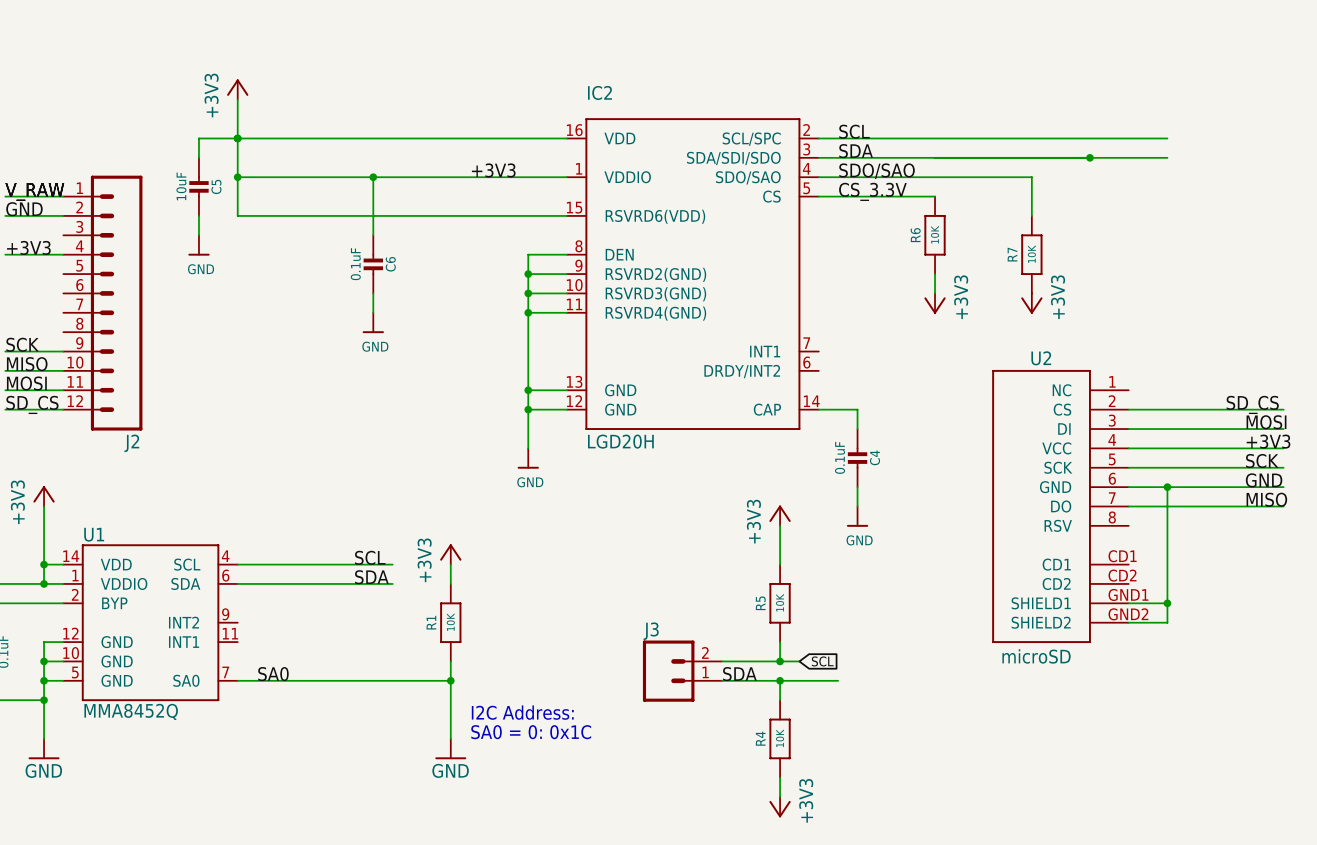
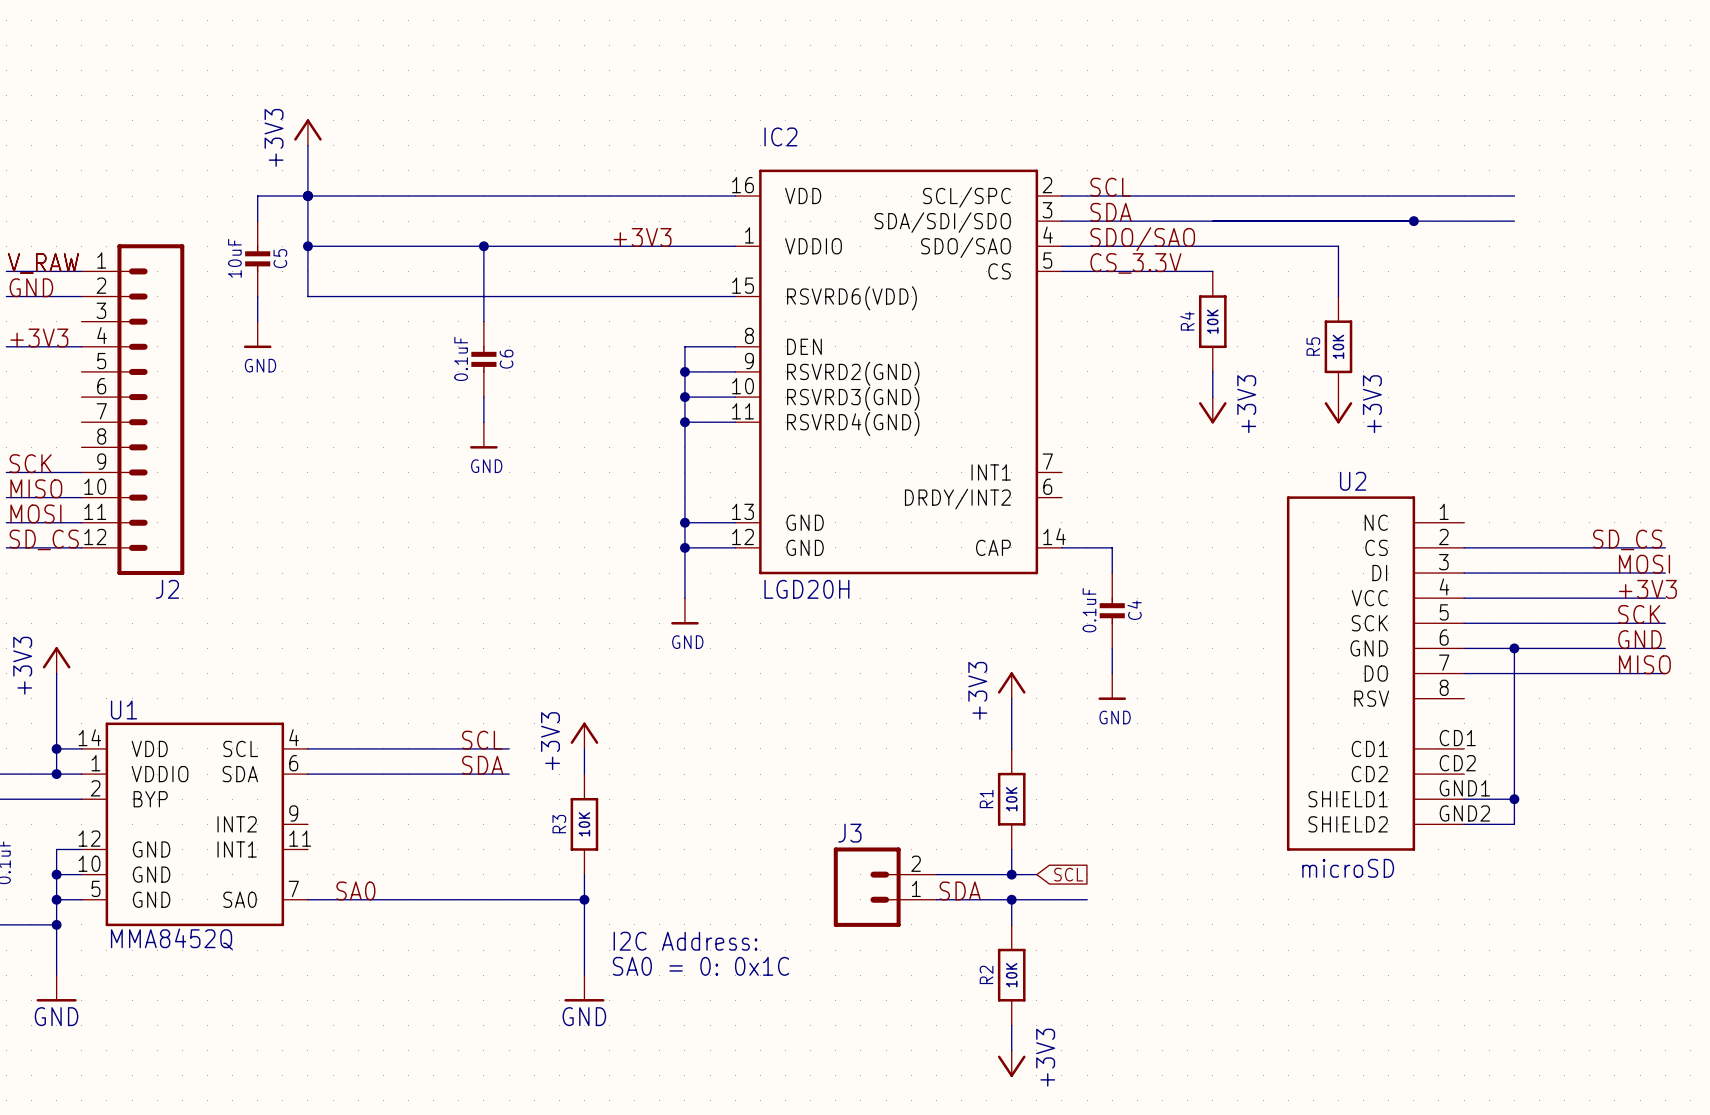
R6 name: R6 (915, 235) -> R4 (1187, 321)
R7 name: R7 (1012, 254) -> R5 (1313, 346)
R5 name: R5 (760, 603) -> R1 (986, 798)
R1 name: R1 (431, 622) -> R3 (559, 824)
R4 name: R4 (760, 738) -> R2 (986, 974)

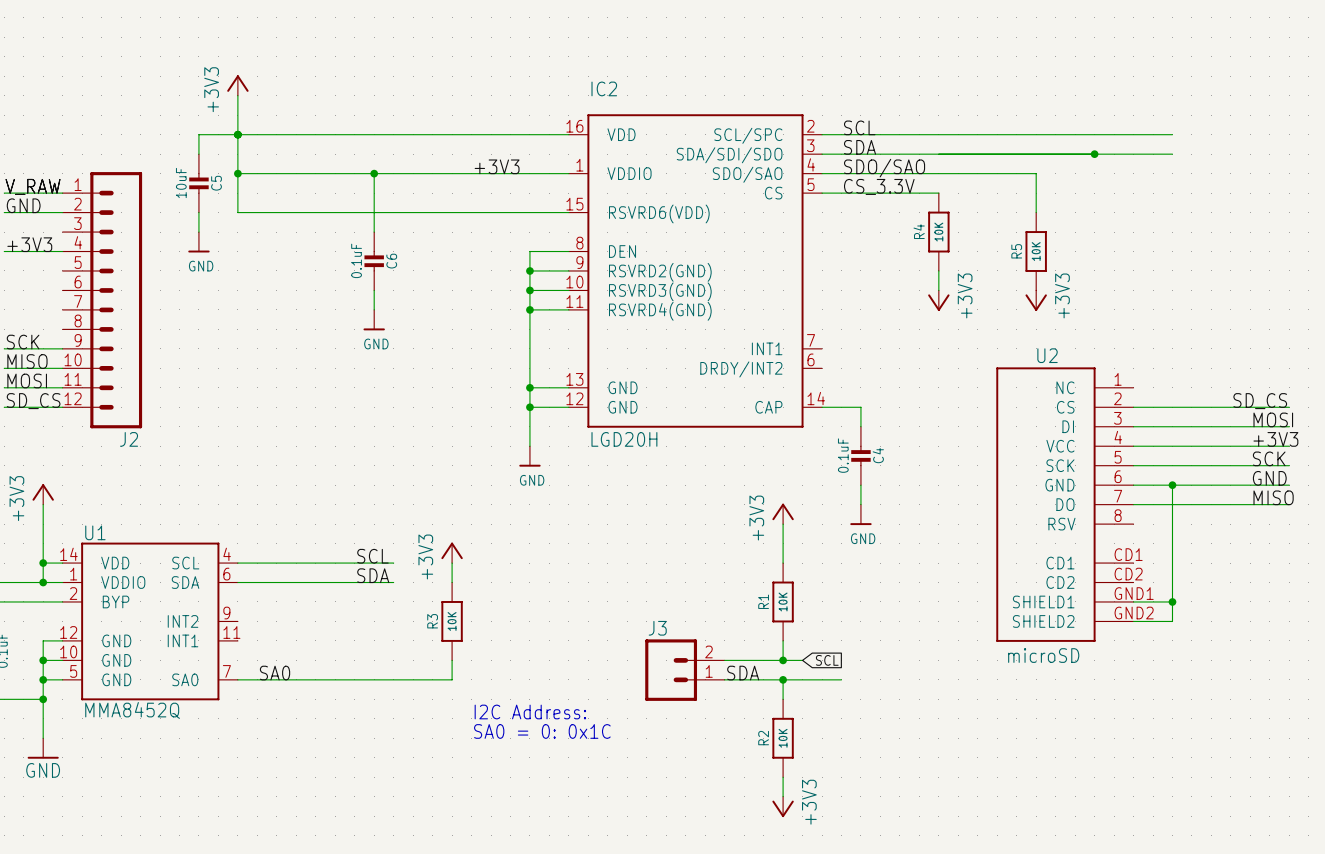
wire: (584, 899) (584, 975) -> none
junction: (584, 899) -> none
power symbol: GND (584, 988) -> none

